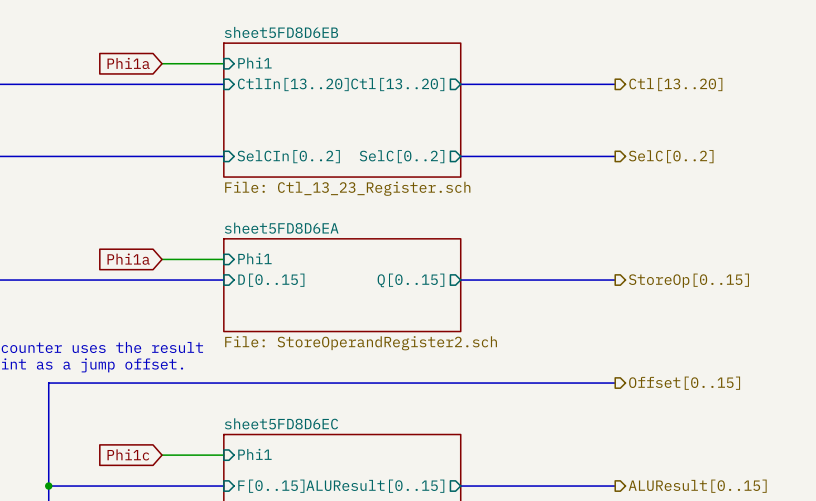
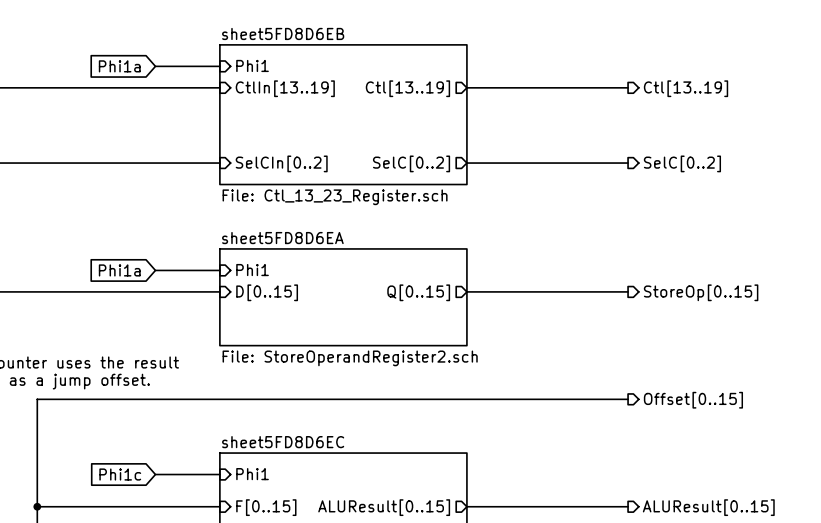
sheet pin: CtlIn[13..20] (293, 84) -> CtlIn[13..19] (285, 88)
sheet pin: Ctl[13..20] (397, 84) -> Ctl[13..19] (407, 88)
hierarchical label: Ctl[13..20] (675, 84) -> Ctl[13..19] (686, 88)

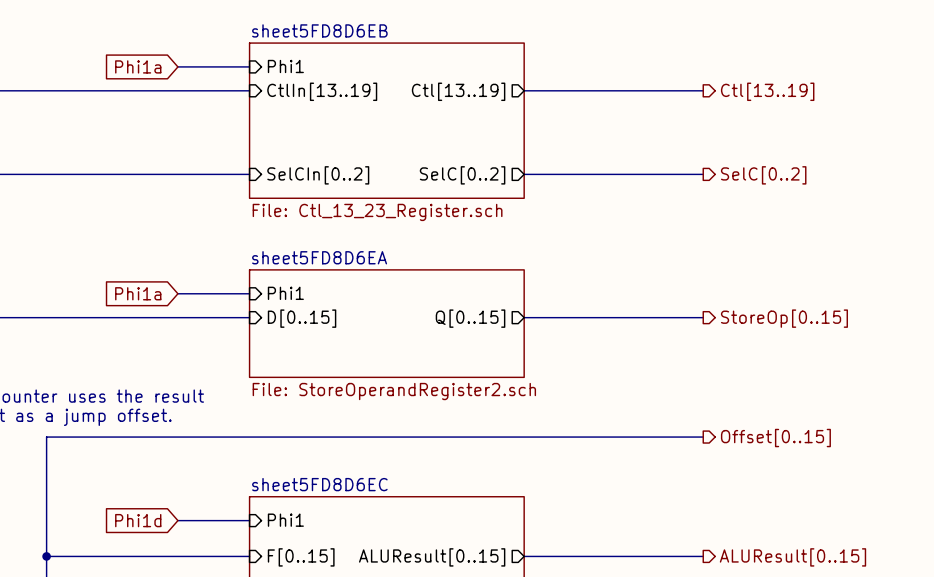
global label: Phi1c (120, 474) -> Phi1d (138, 520)

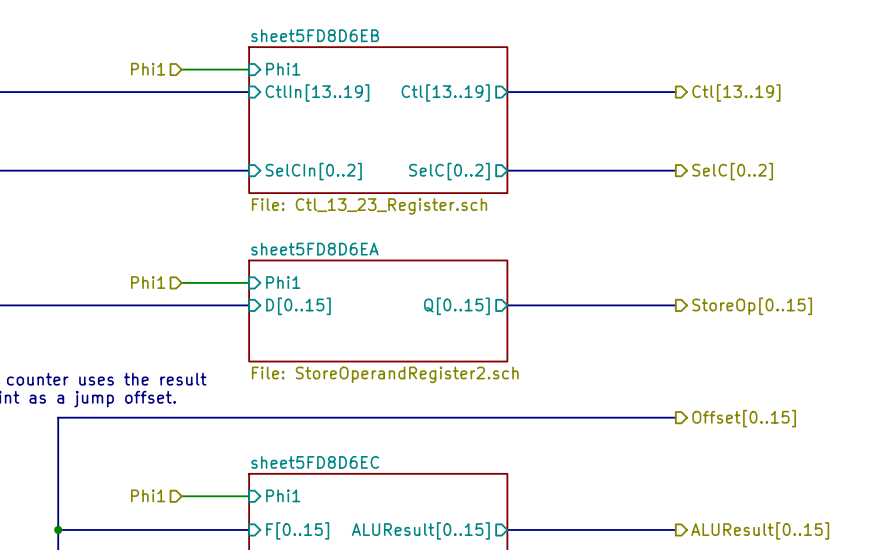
global label: Phi1a (138, 66) -> none
hierarchical label: none -> Phi1 (148, 69)
global label: Phi1a (138, 293) -> none
hierarchical label: none -> Phi1 (148, 282)
global label: Phi1d (138, 520) -> none
hierarchical label: none -> Phi1 (148, 495)

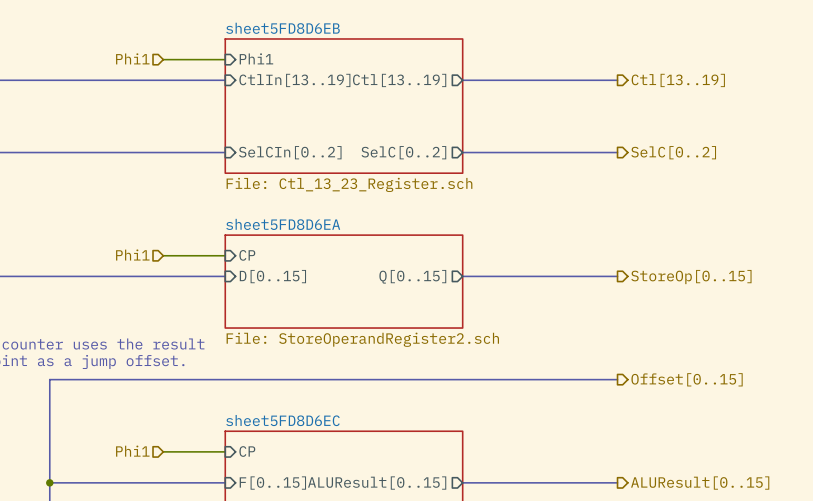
sheet pin: Phi1 (283, 282) -> CP (247, 255)
sheet pin: Phi1 (283, 495) -> CP (247, 451)

